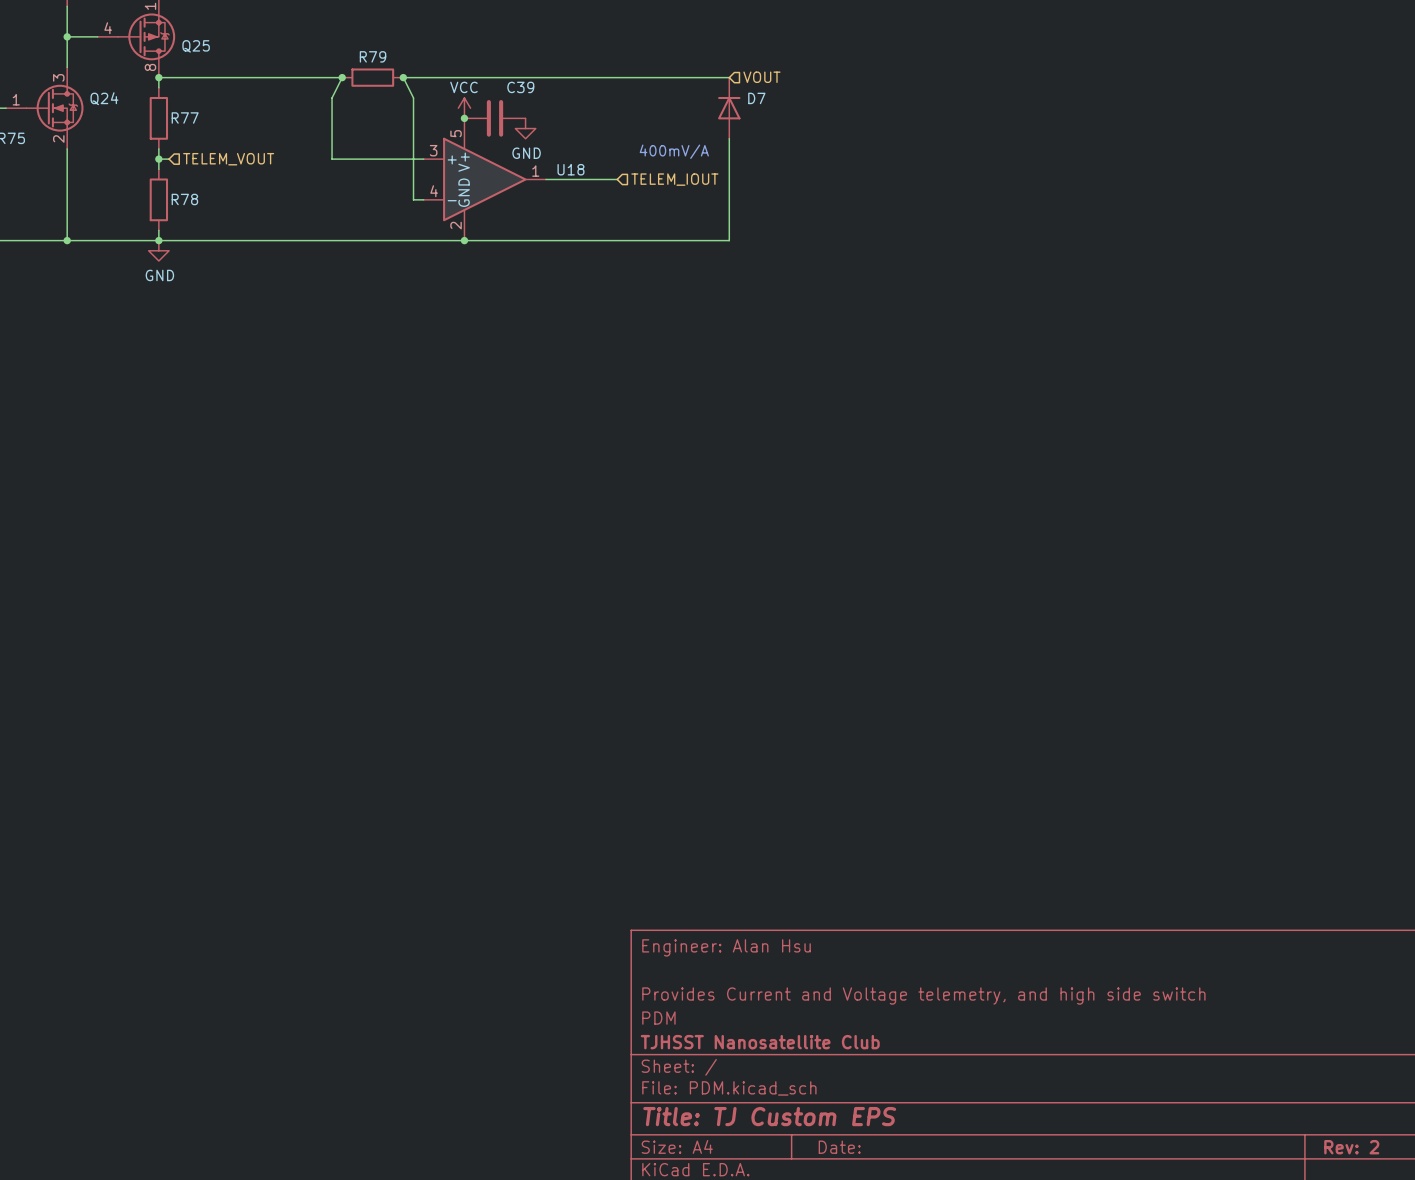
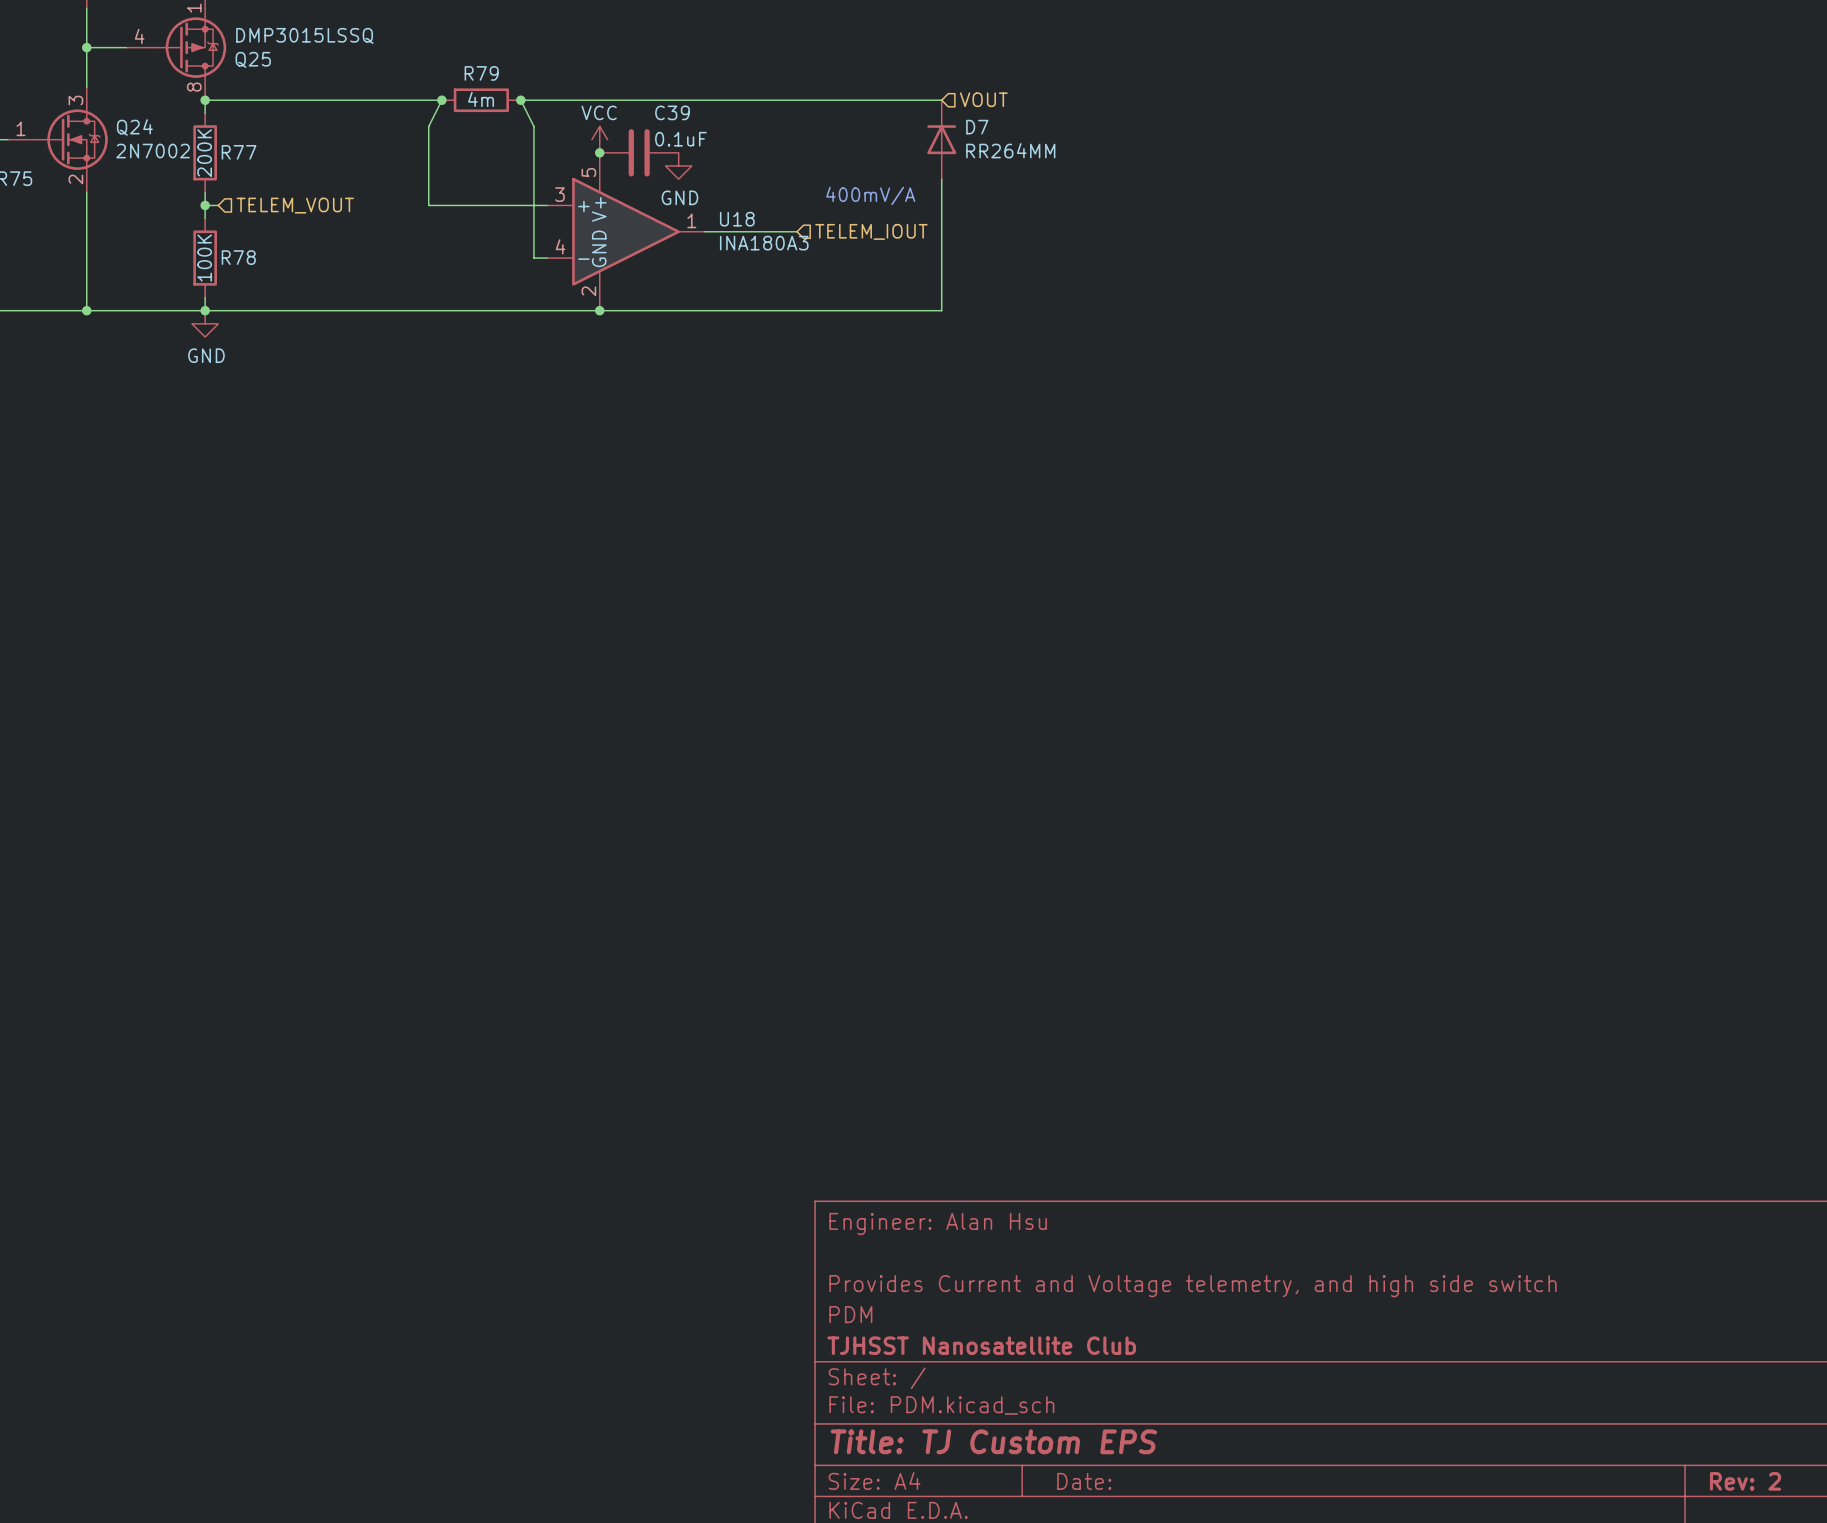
Q25 value: none -> DMP3015LSSQ (304, 35)
R79 value: none -> 4m (481, 99)
C39 value: none -> 0.1uF (680, 139)
Q24 value: none -> 2N7002 (153, 151)
D7 value: none -> RR264MM (1010, 150)
R77 value: none -> 200K (204, 153)
U18 value: none -> INA180A3 (764, 243)
R78 value: none -> 100K (204, 258)

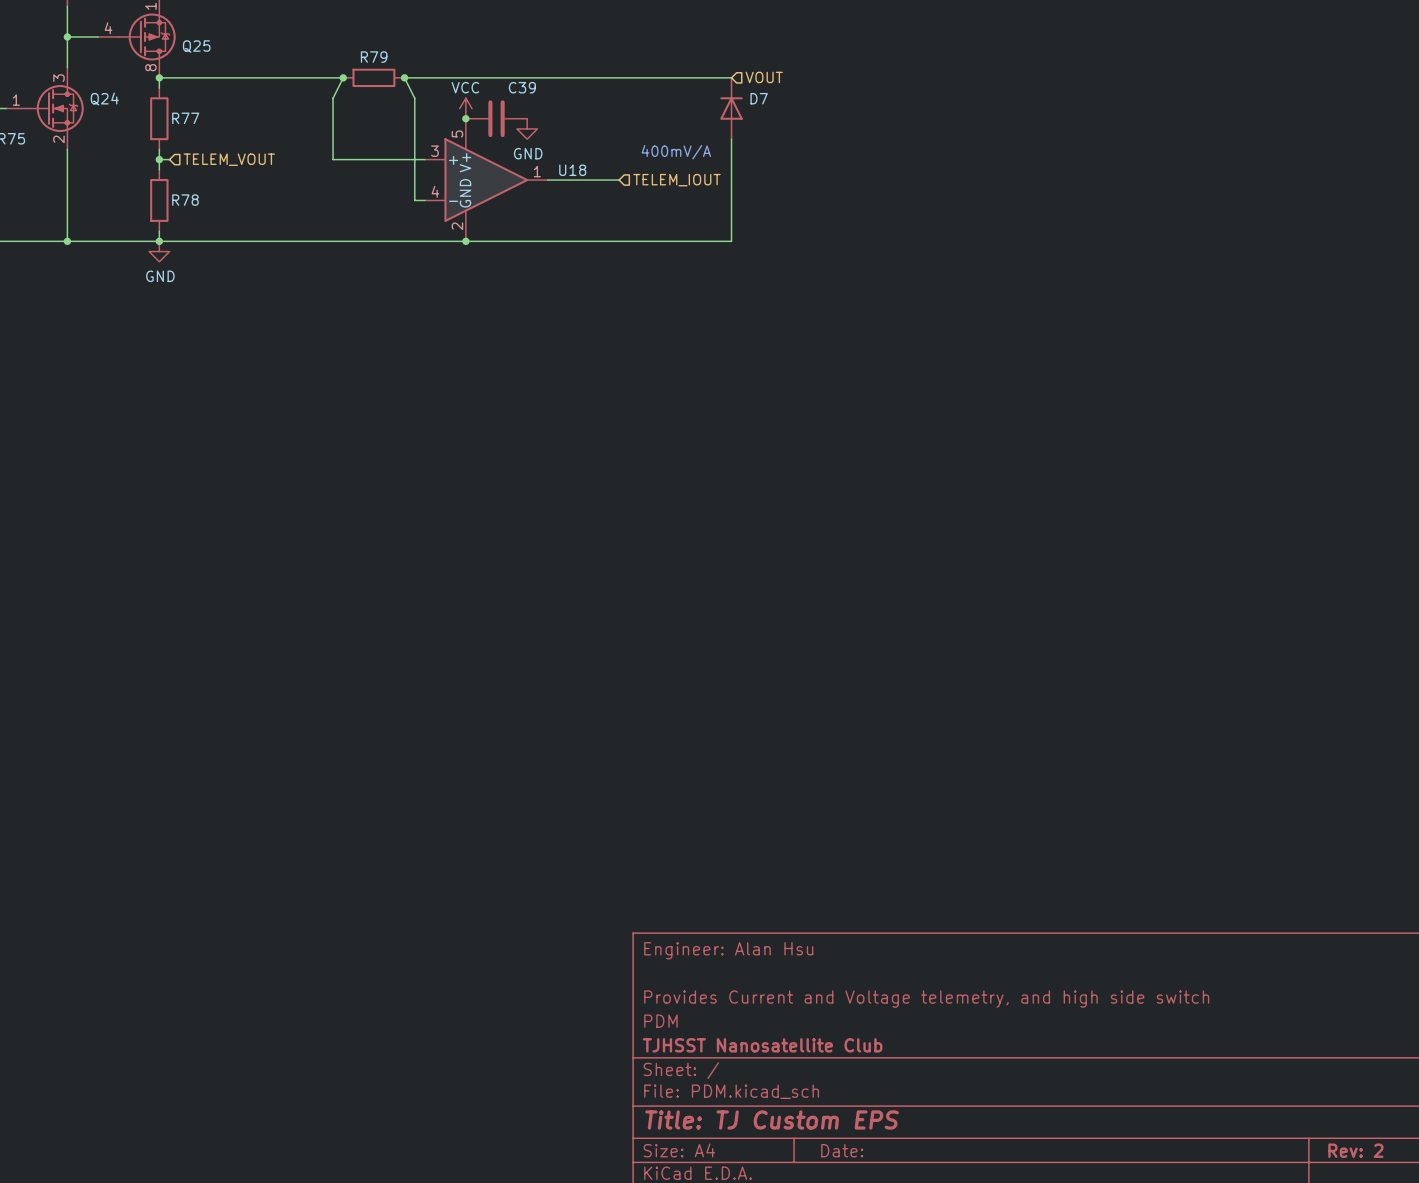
Q25 value: DMP3015LSSQ (304, 35) -> none
R79 value: 4m (481, 99) -> none
C39 value: 0.1uF (680, 139) -> none
D7 value: RR264MM (1010, 150) -> none
Q24 value: 2N7002 (153, 151) -> none
R77 value: 200K (204, 153) -> none
U18 value: INA180A3 (764, 243) -> none
R78 value: 100K (204, 258) -> none

